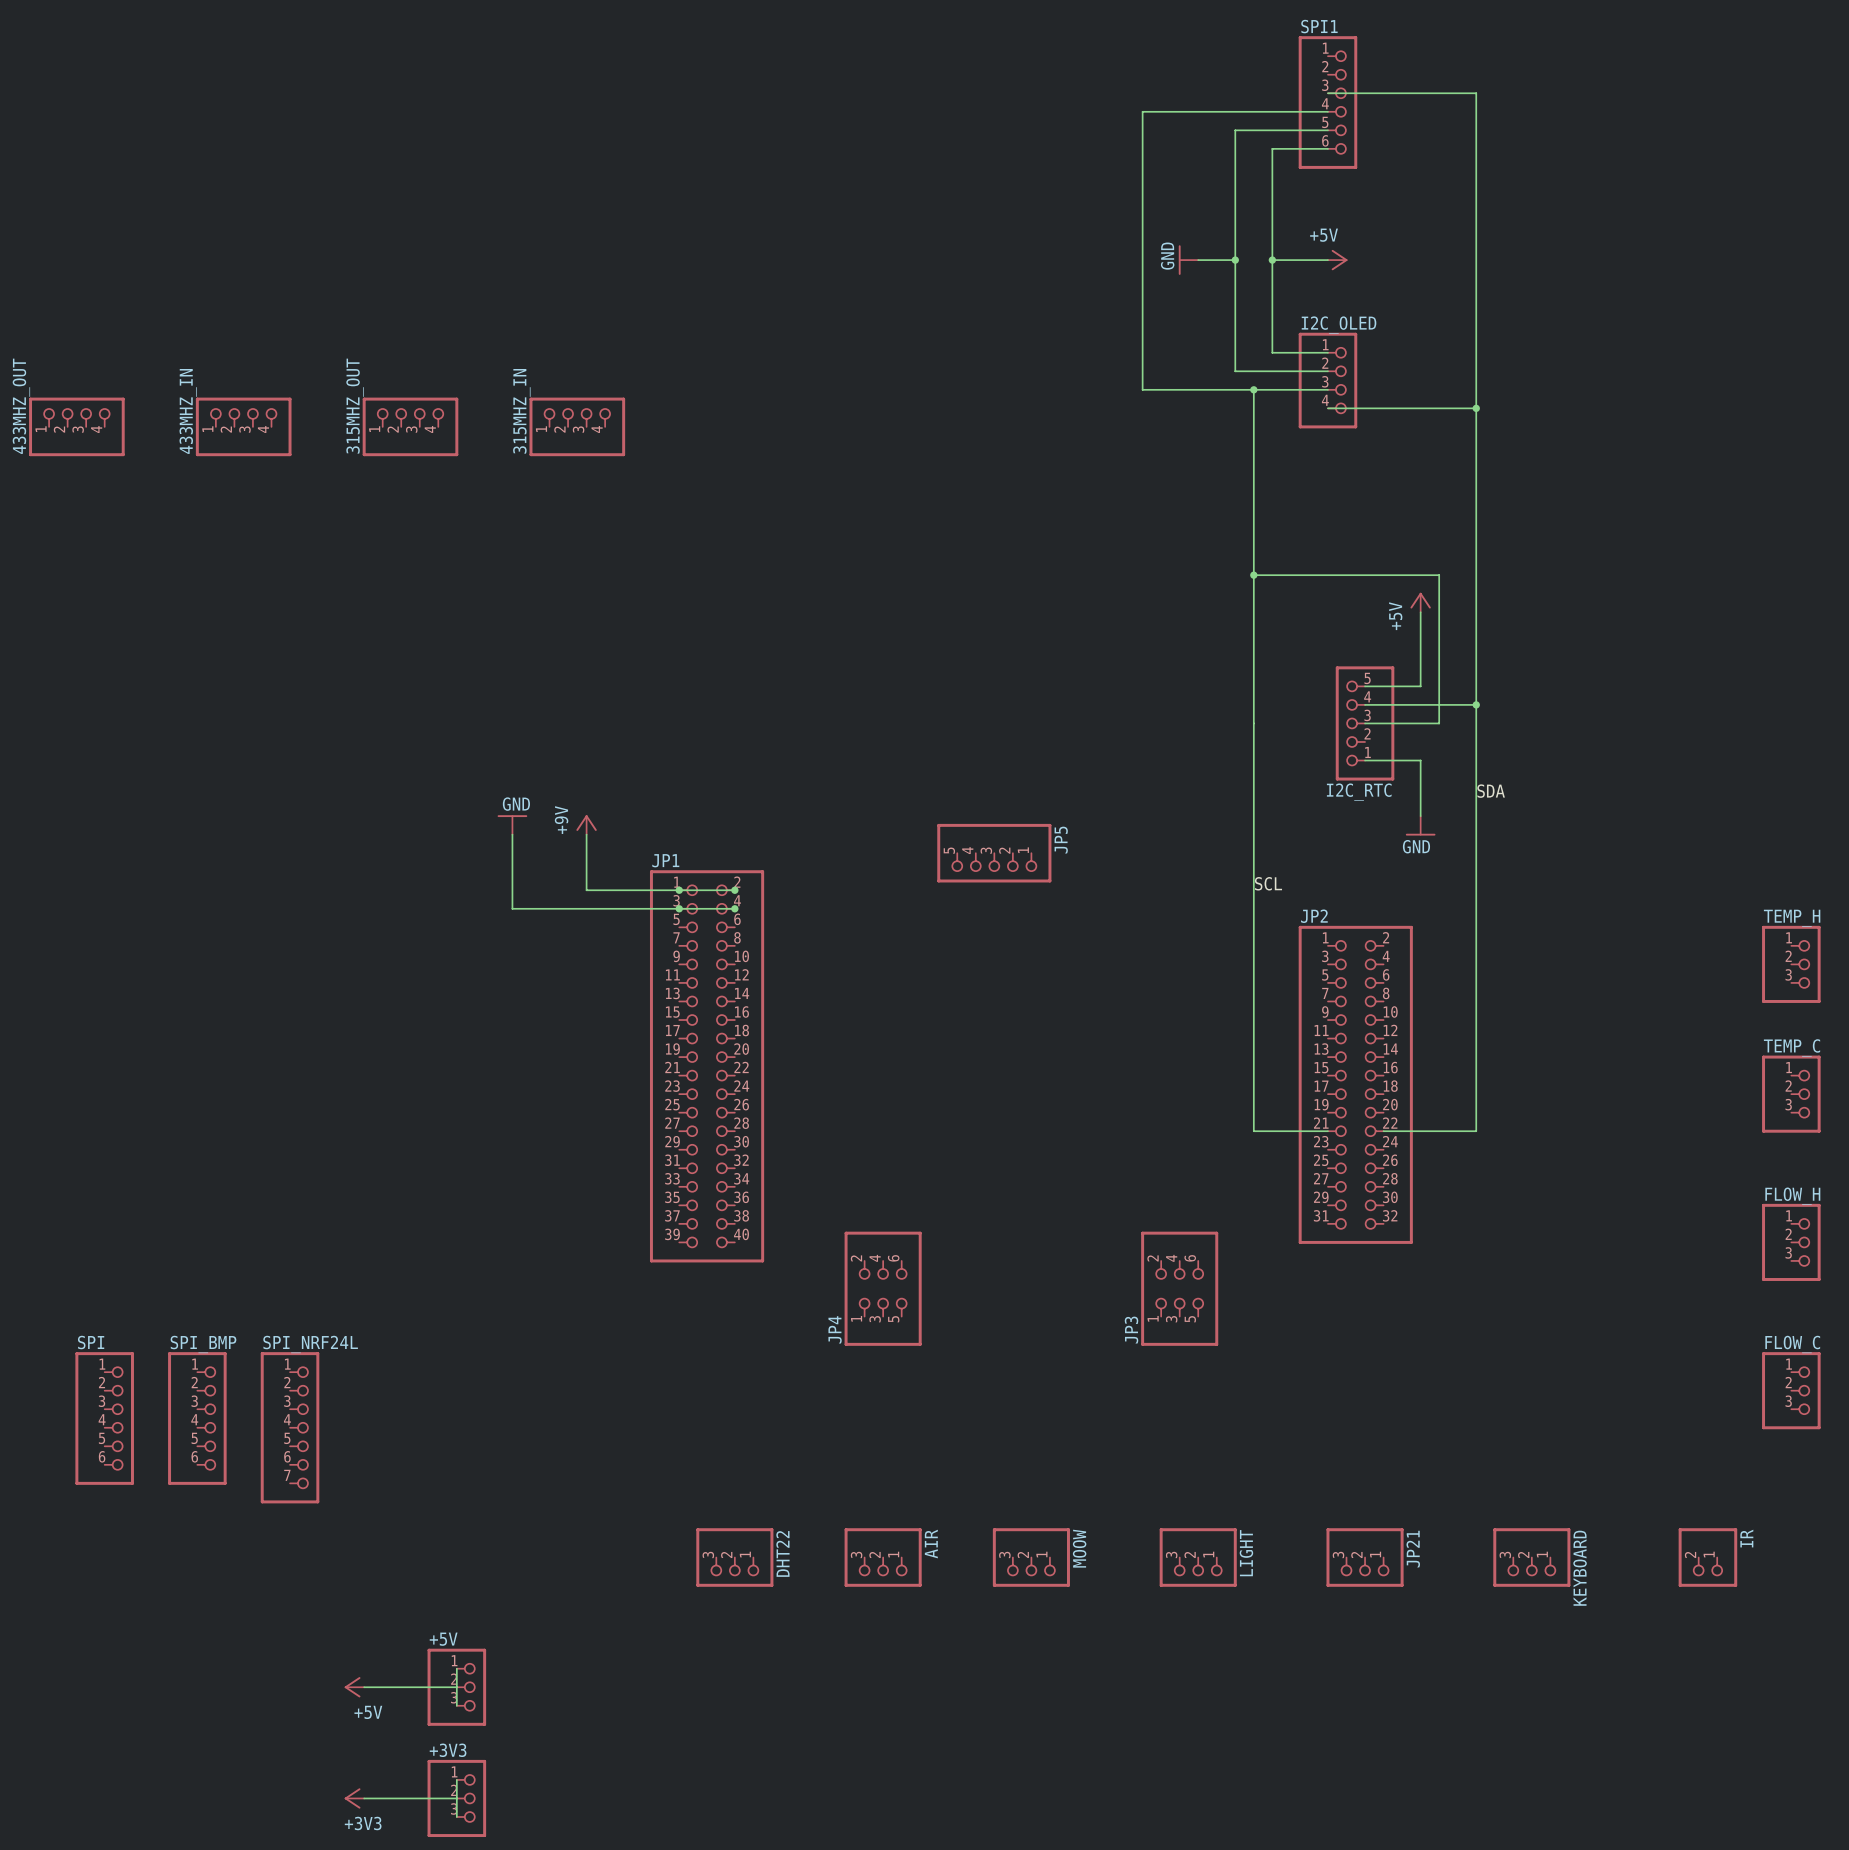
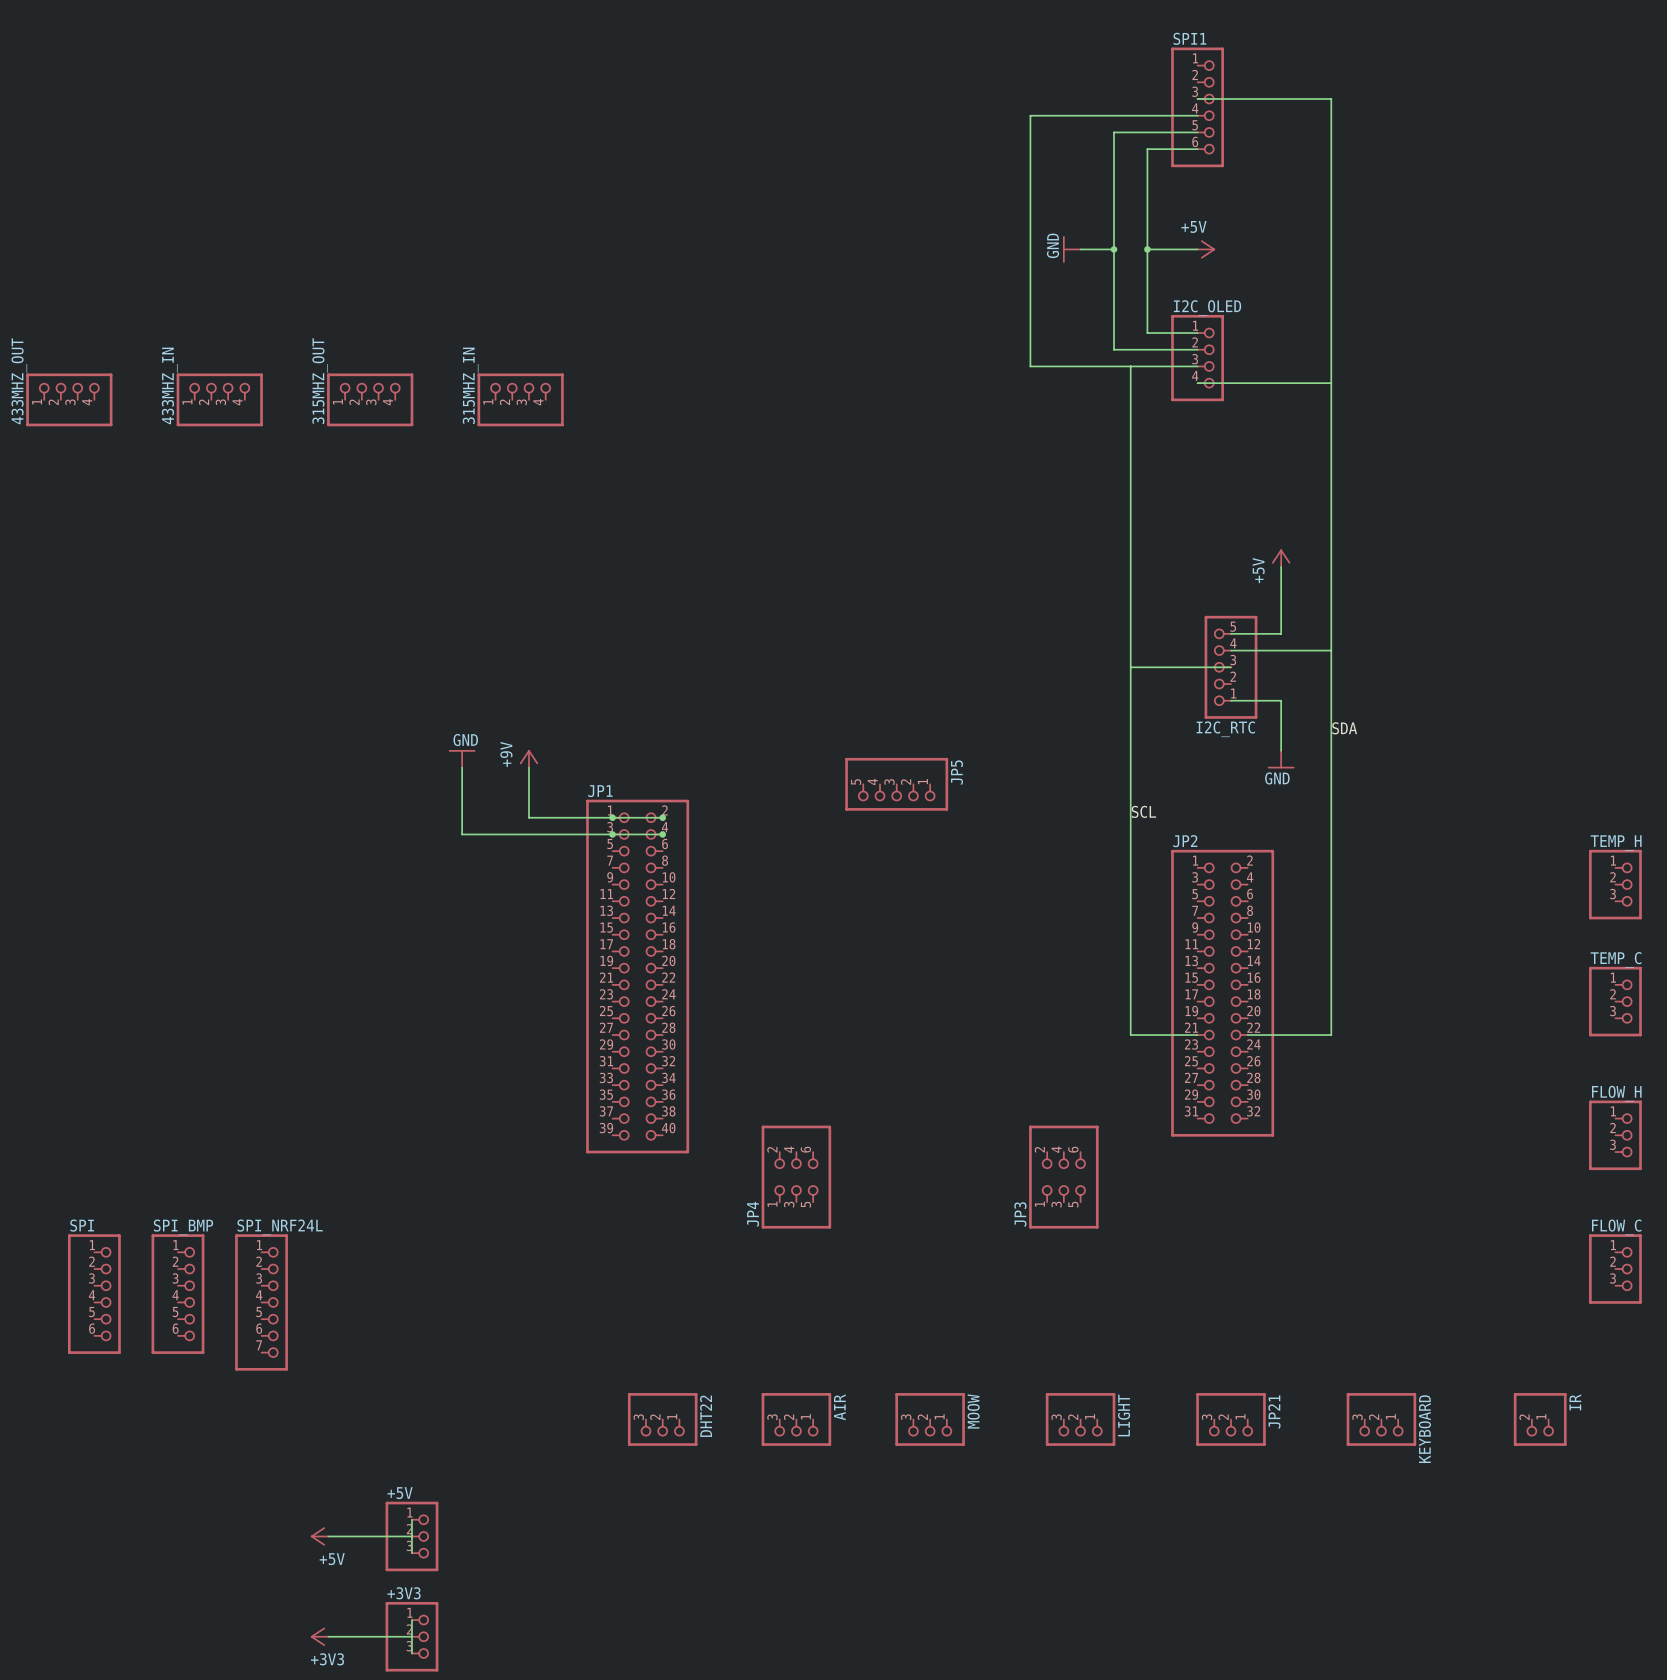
junction: (1253, 389) -> none
junction: (1476, 408) -> none
wire: (1253, 575) (1439, 575) (1439, 723) (1365, 723) -> (1130, 667) (1231, 667)
junction: (1253, 575) -> none
junction: (1476, 704) -> none

